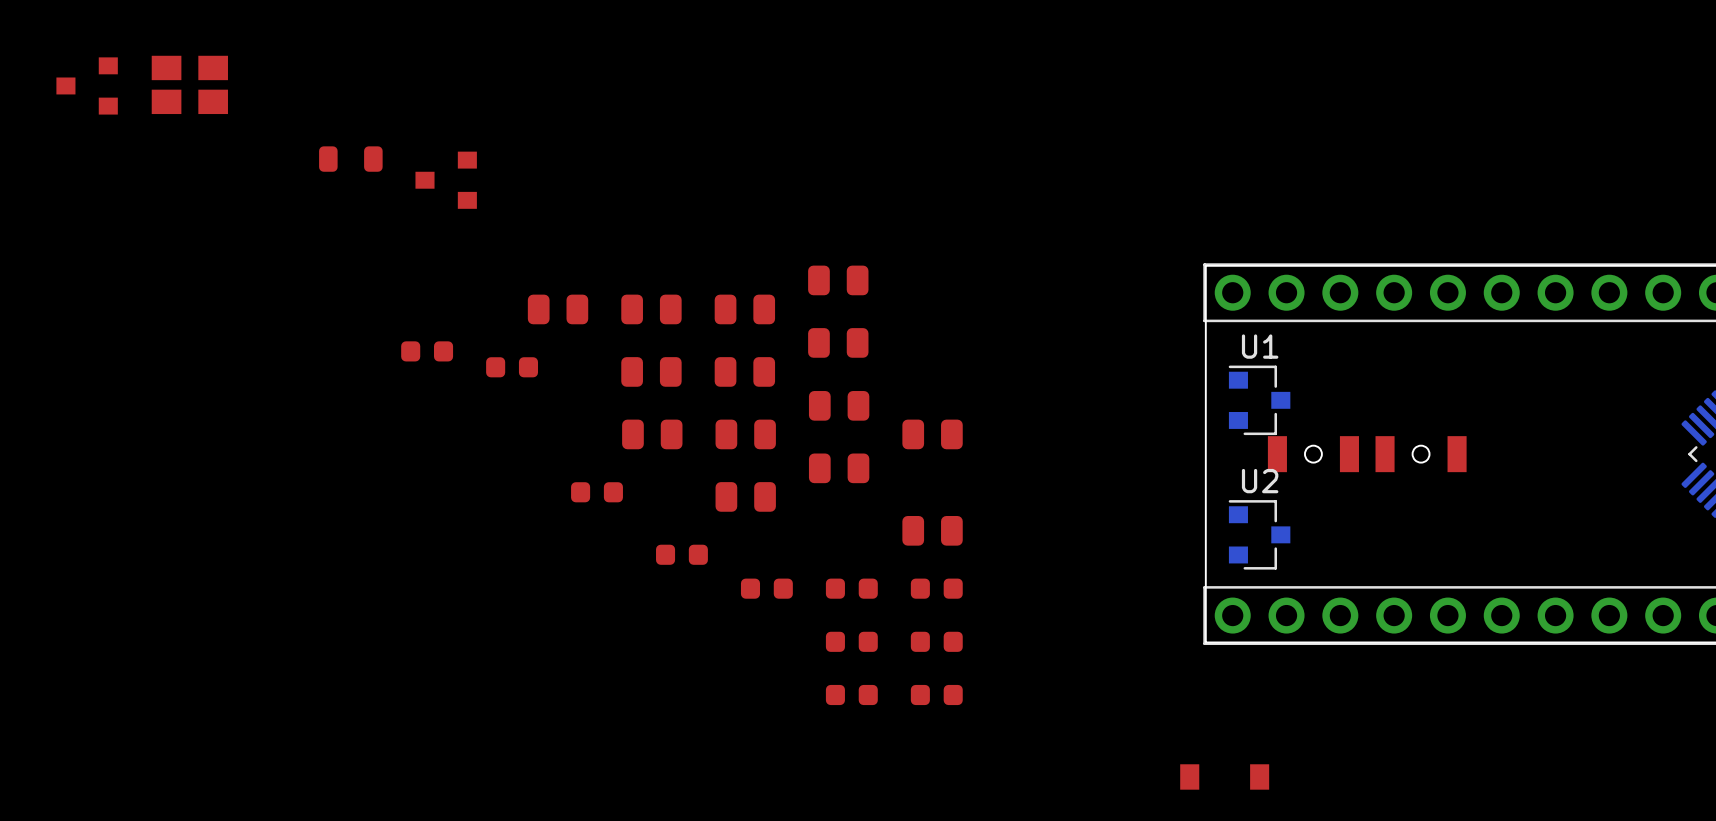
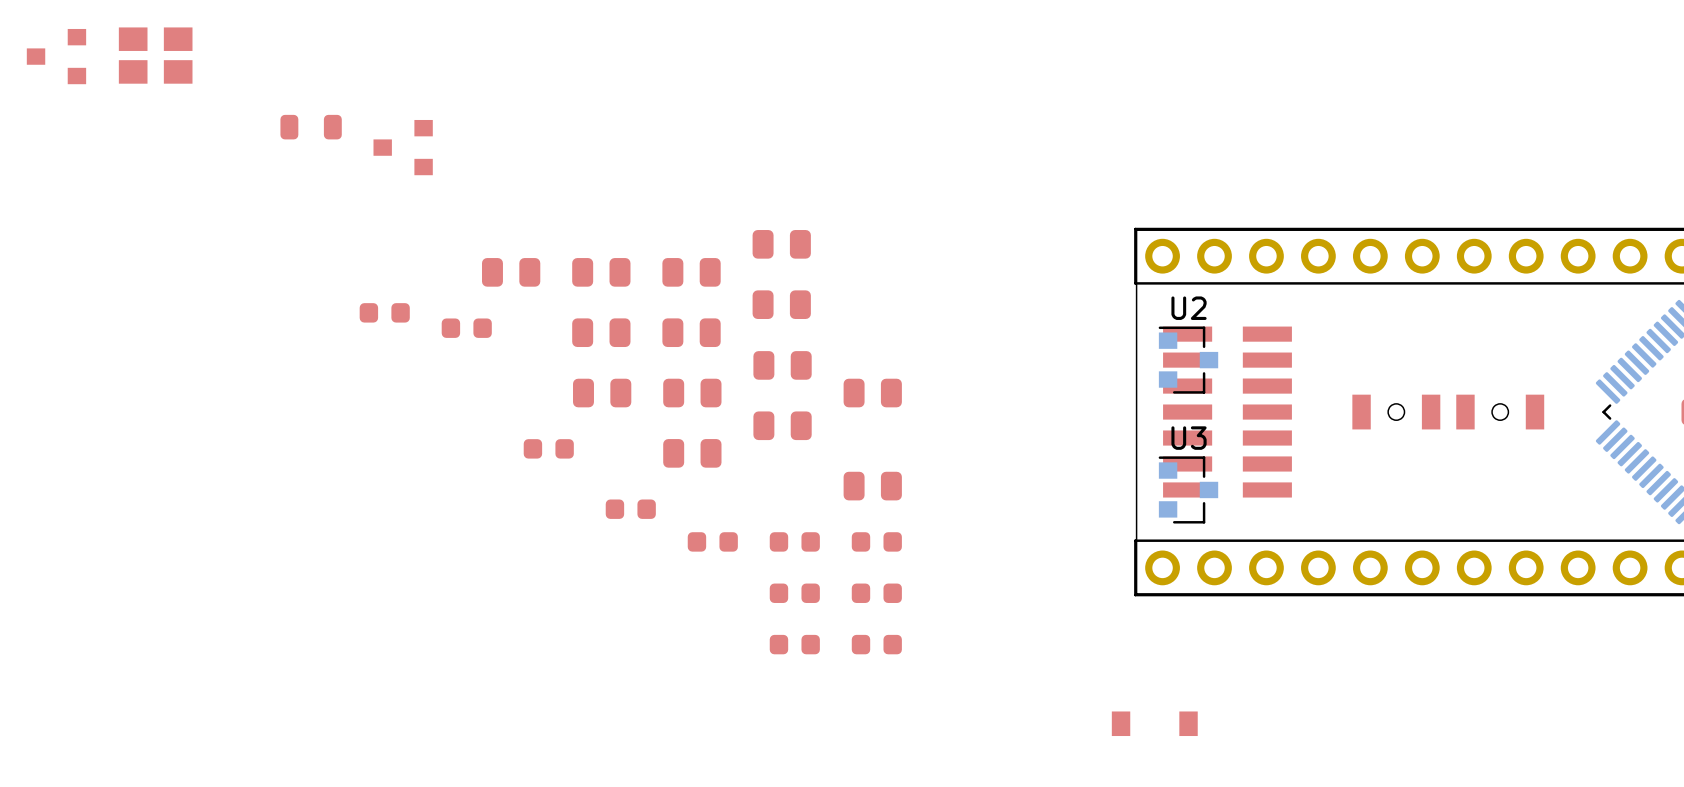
U1 name: U1 (1260, 346) -> U2 (1189, 308)
part footprint: [1267, 436, 1359, 473] -> [1163, 326, 1292, 498]
part position: (1421, 454) -> (1396, 412)
part: none -> (1500, 412)
U2 name: U2 (1260, 481) -> U3 (1189, 438)

